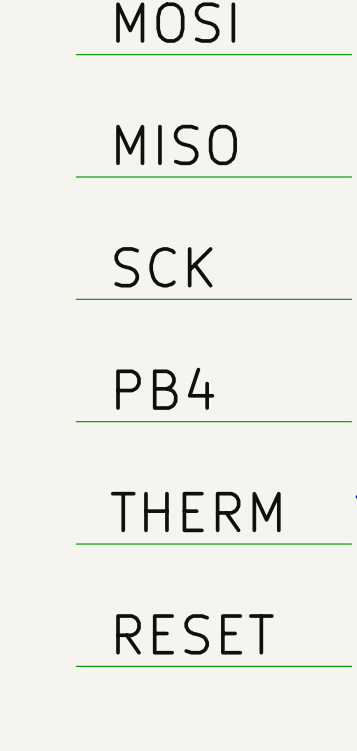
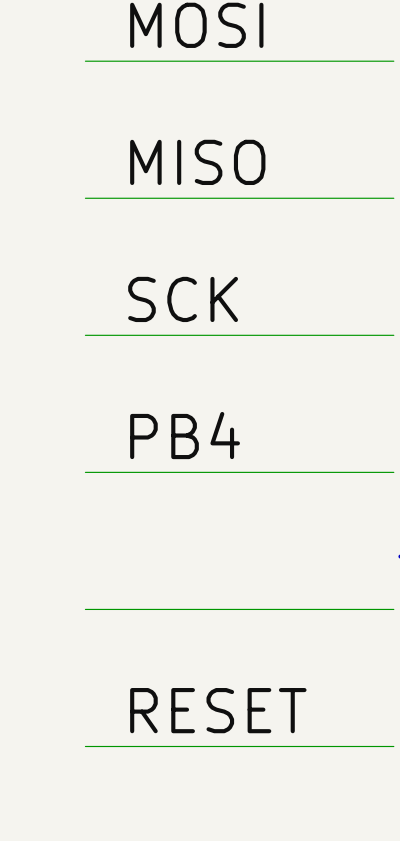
label: THERM (195, 512) -> none

